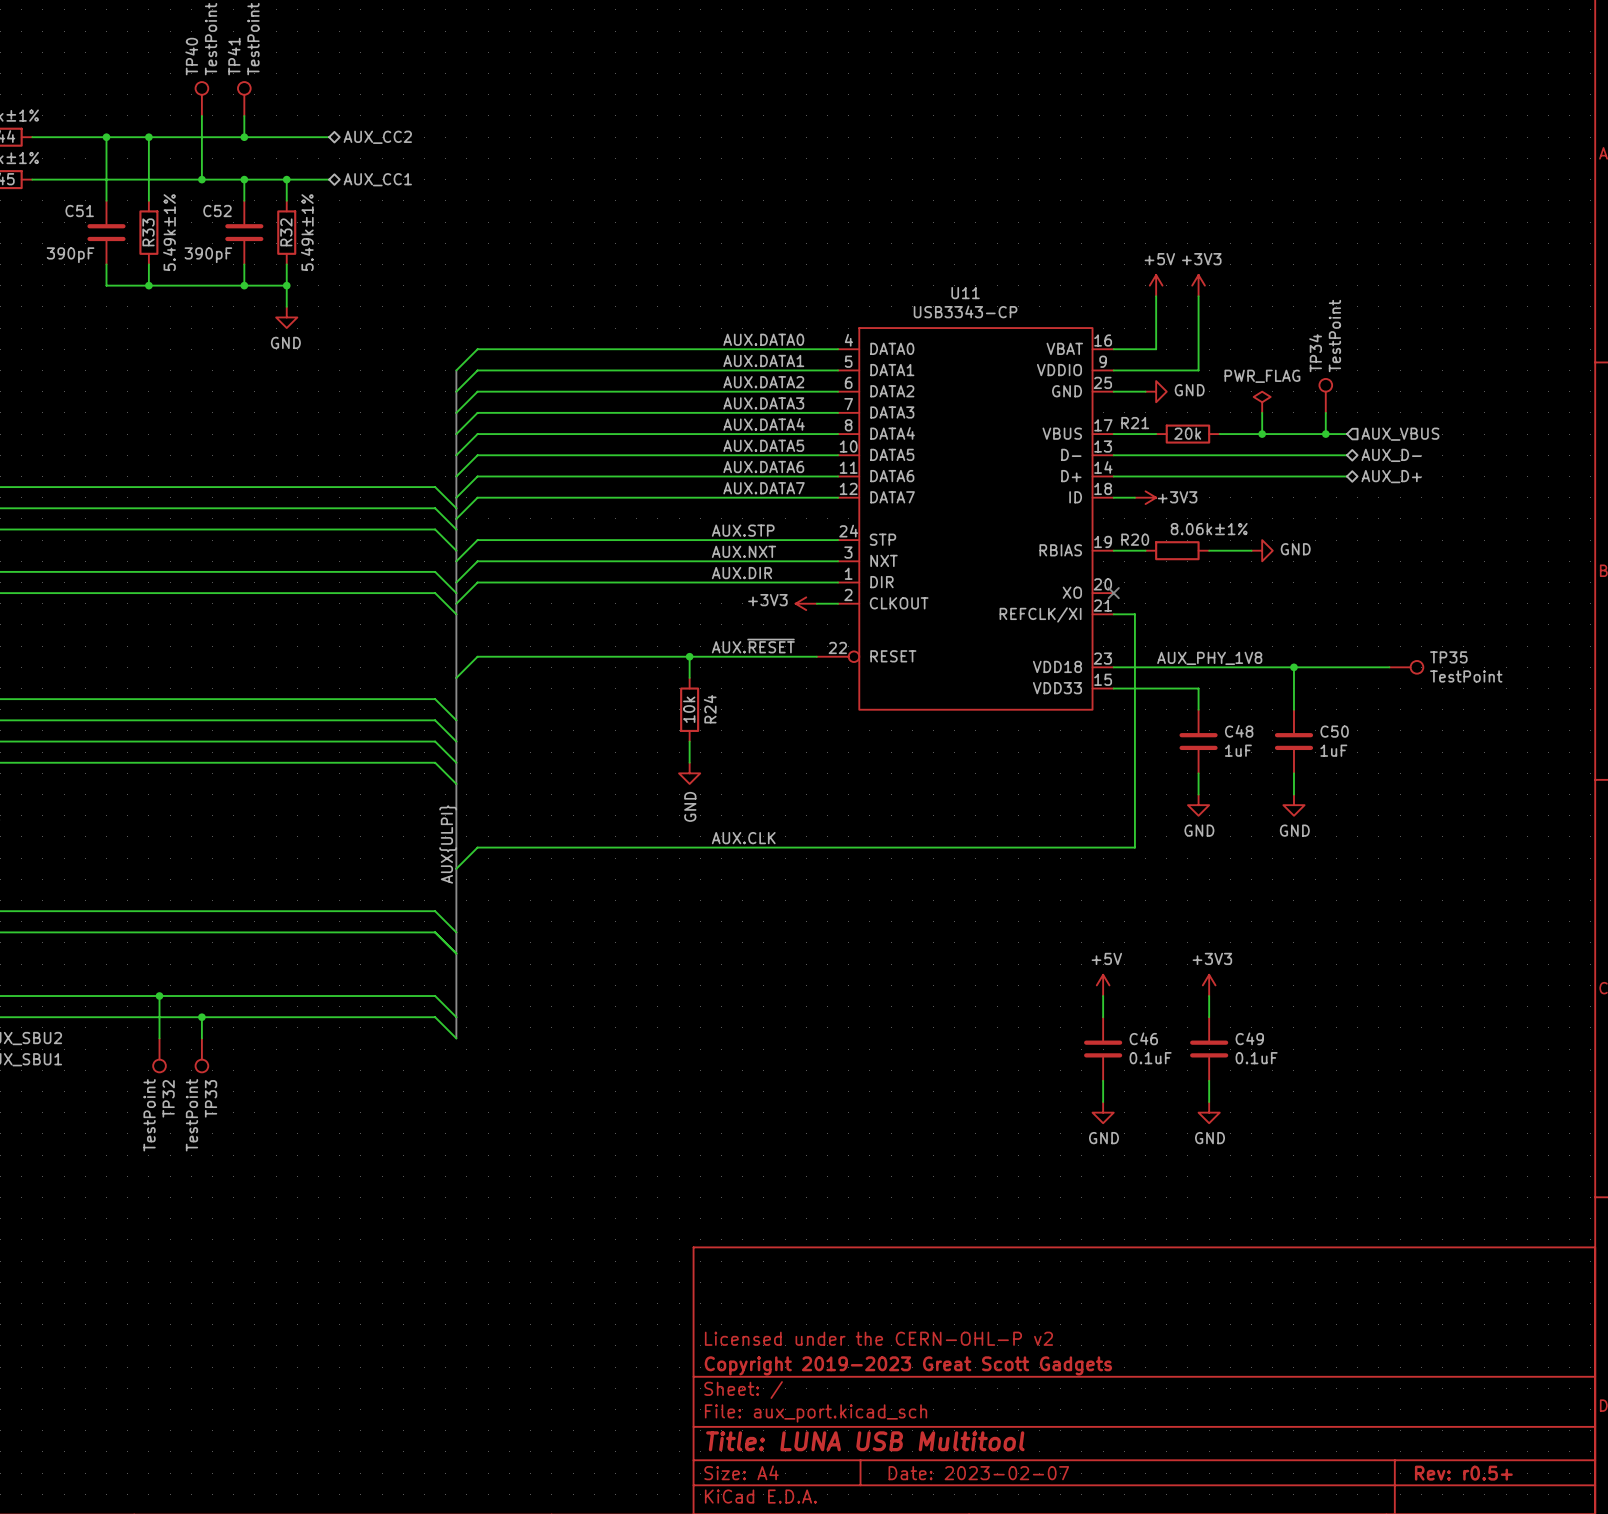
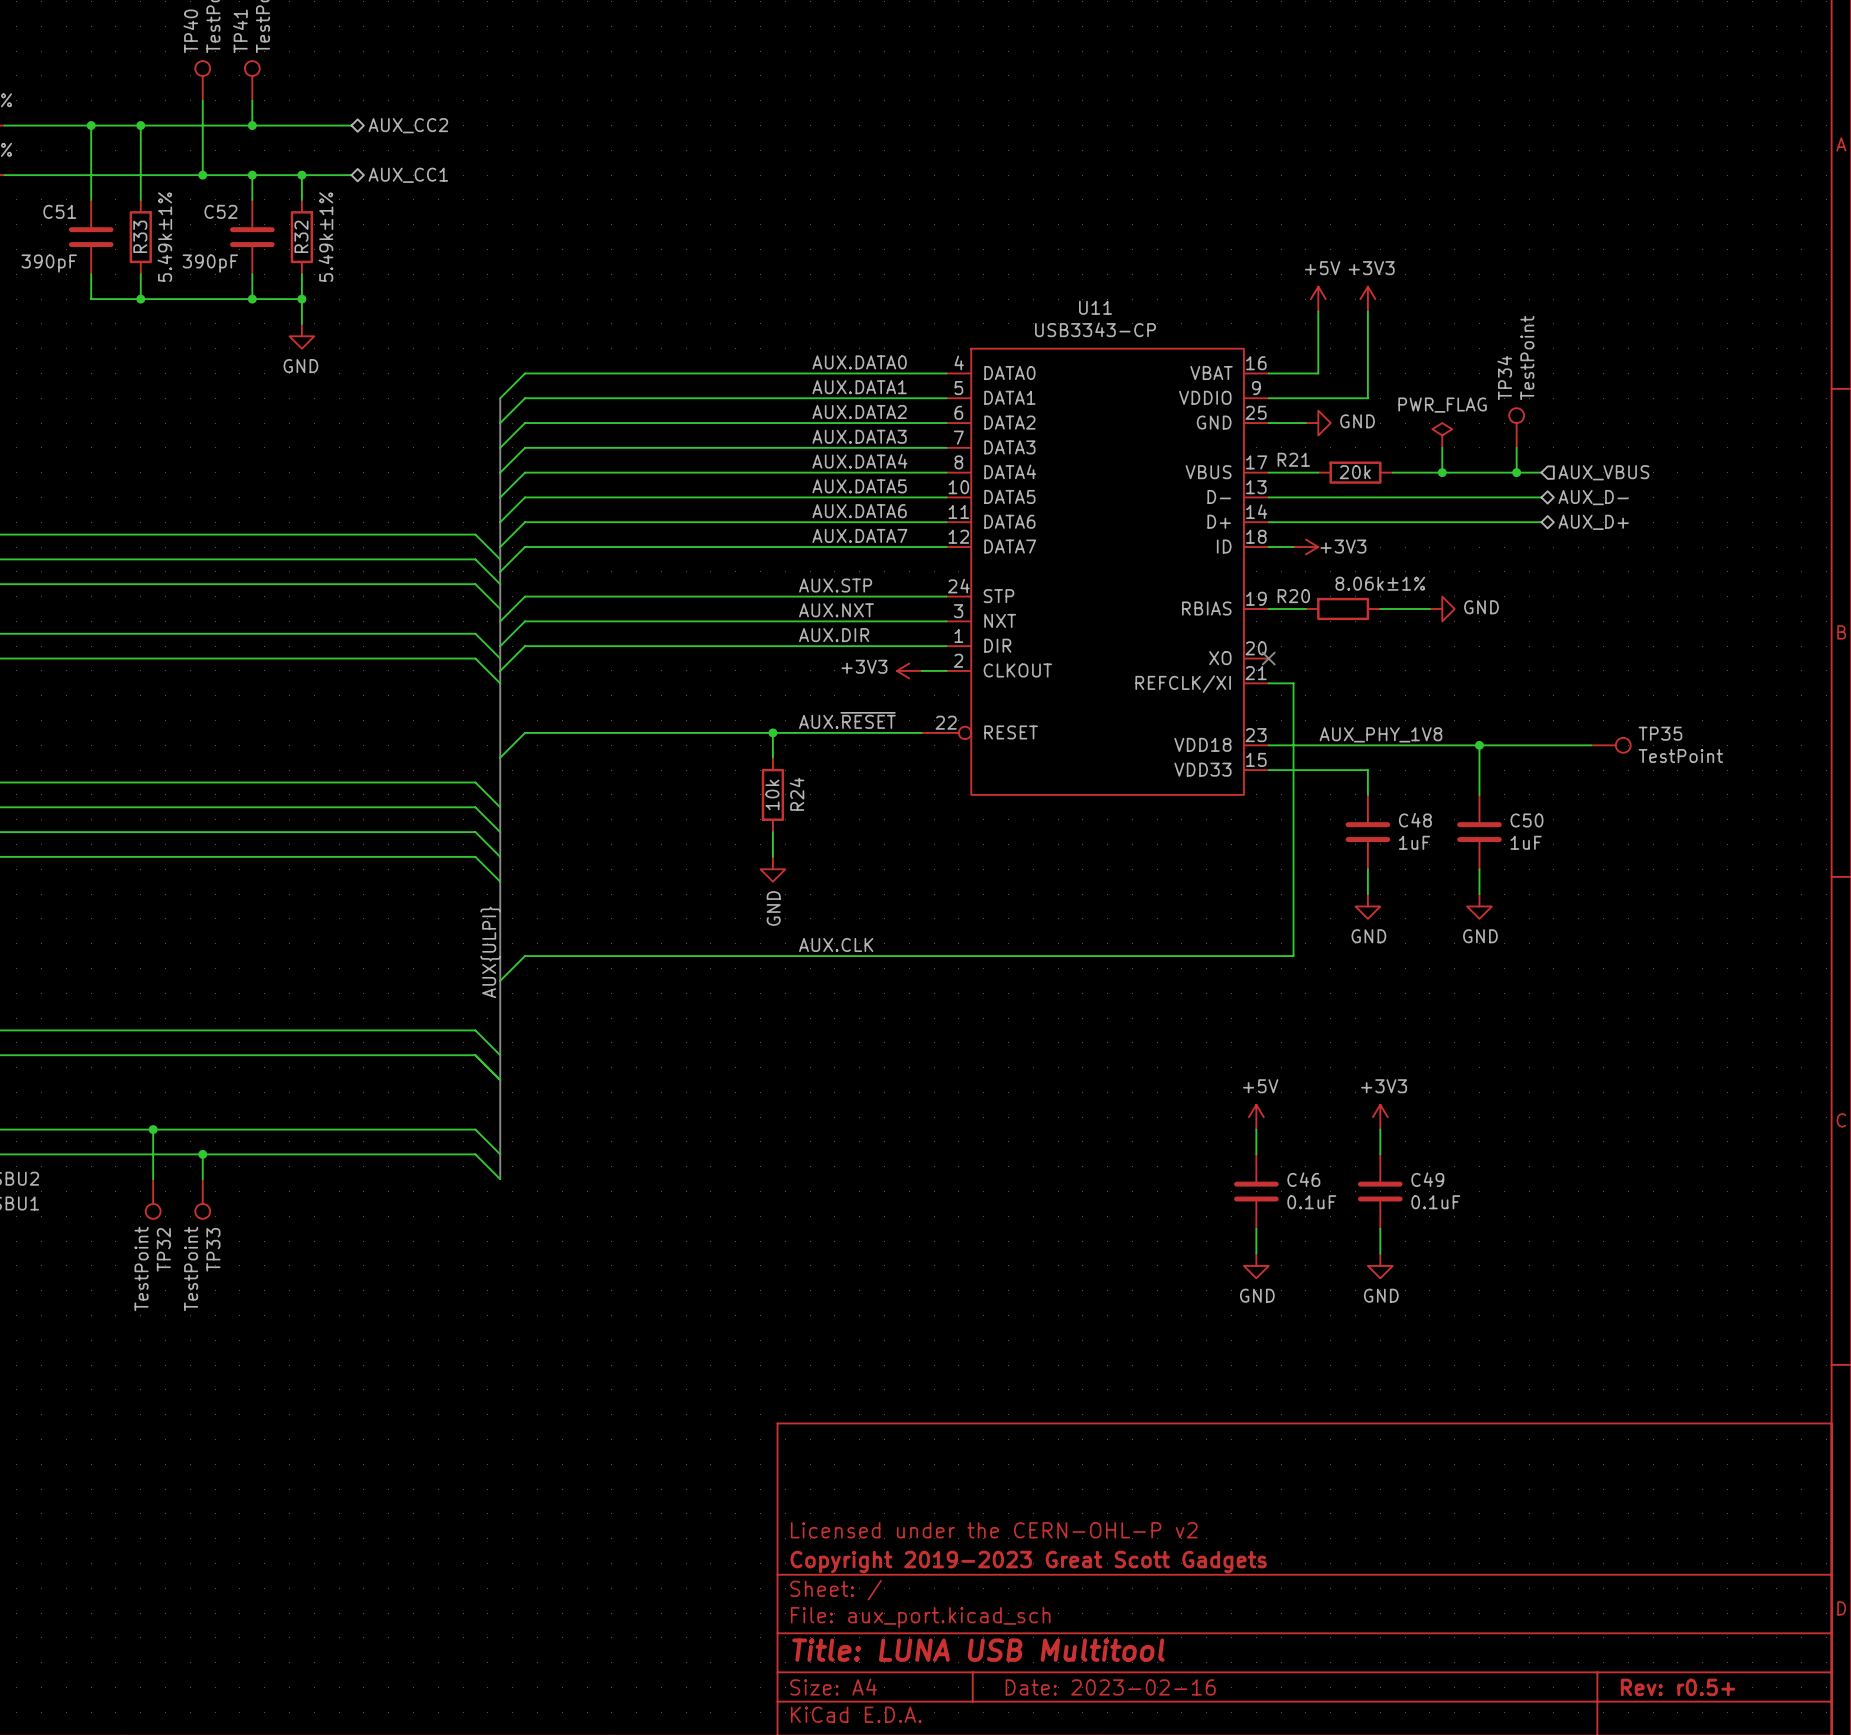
title block: Date: 2023-02-07 (978, 1473) -> Date: 2023-02-16 (1110, 1687)

